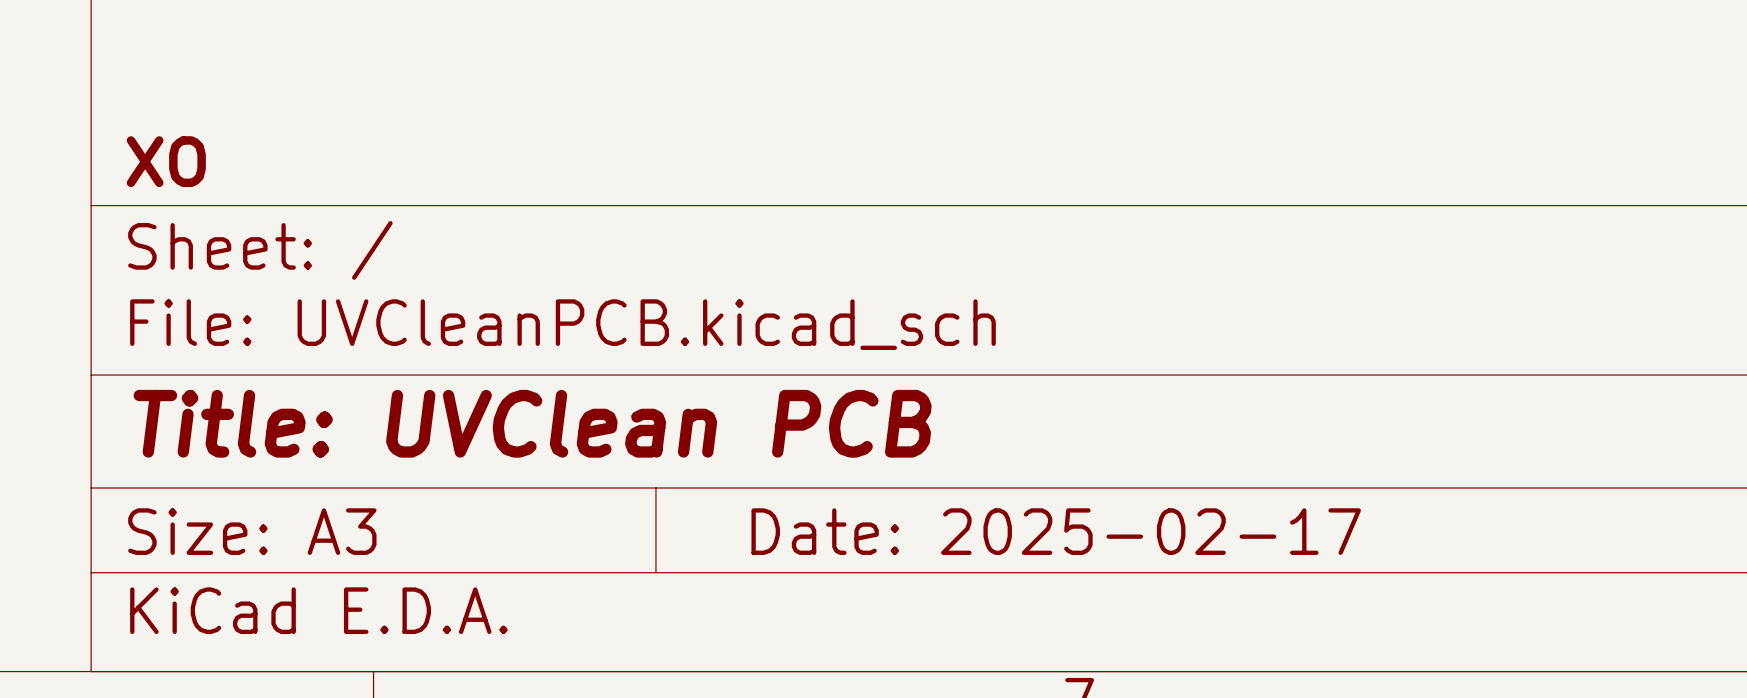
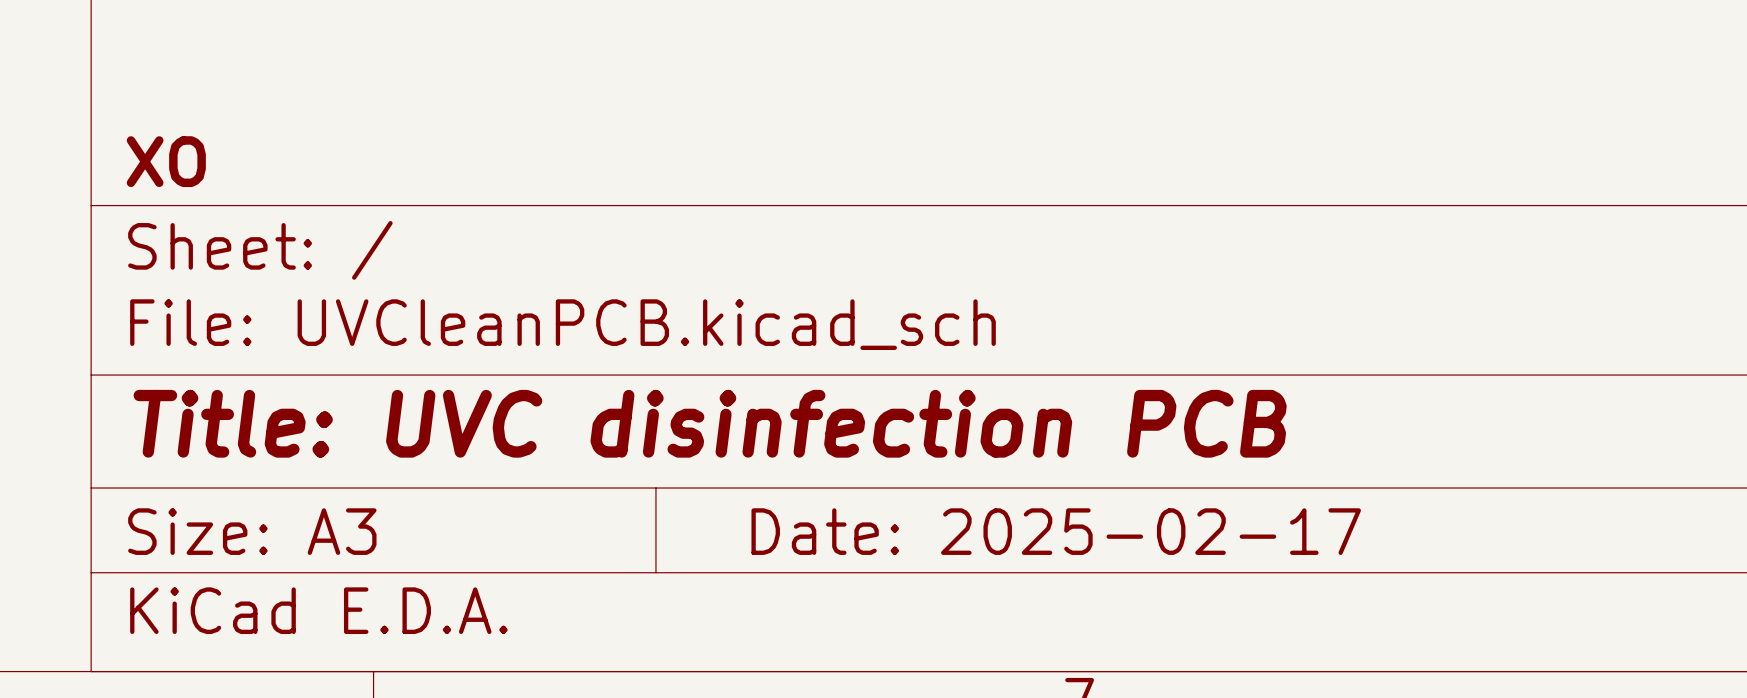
title block: Title: UVClean PCB (532, 423) -> Title: UVC disinfection PCB (710, 423)

